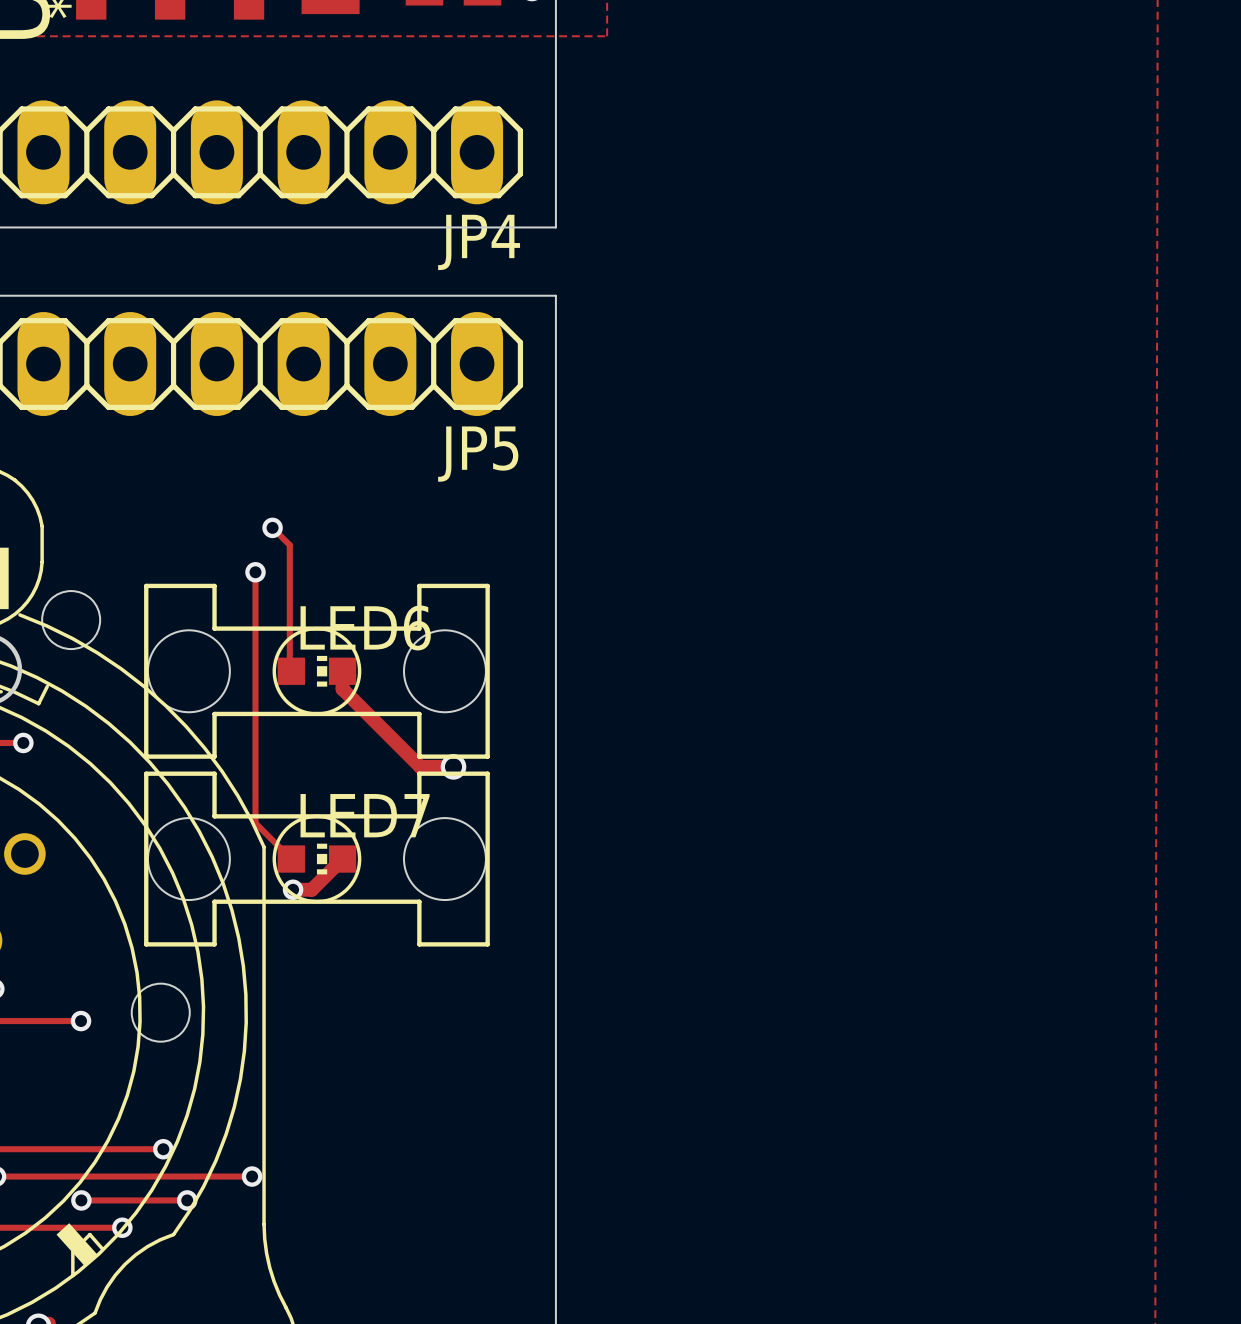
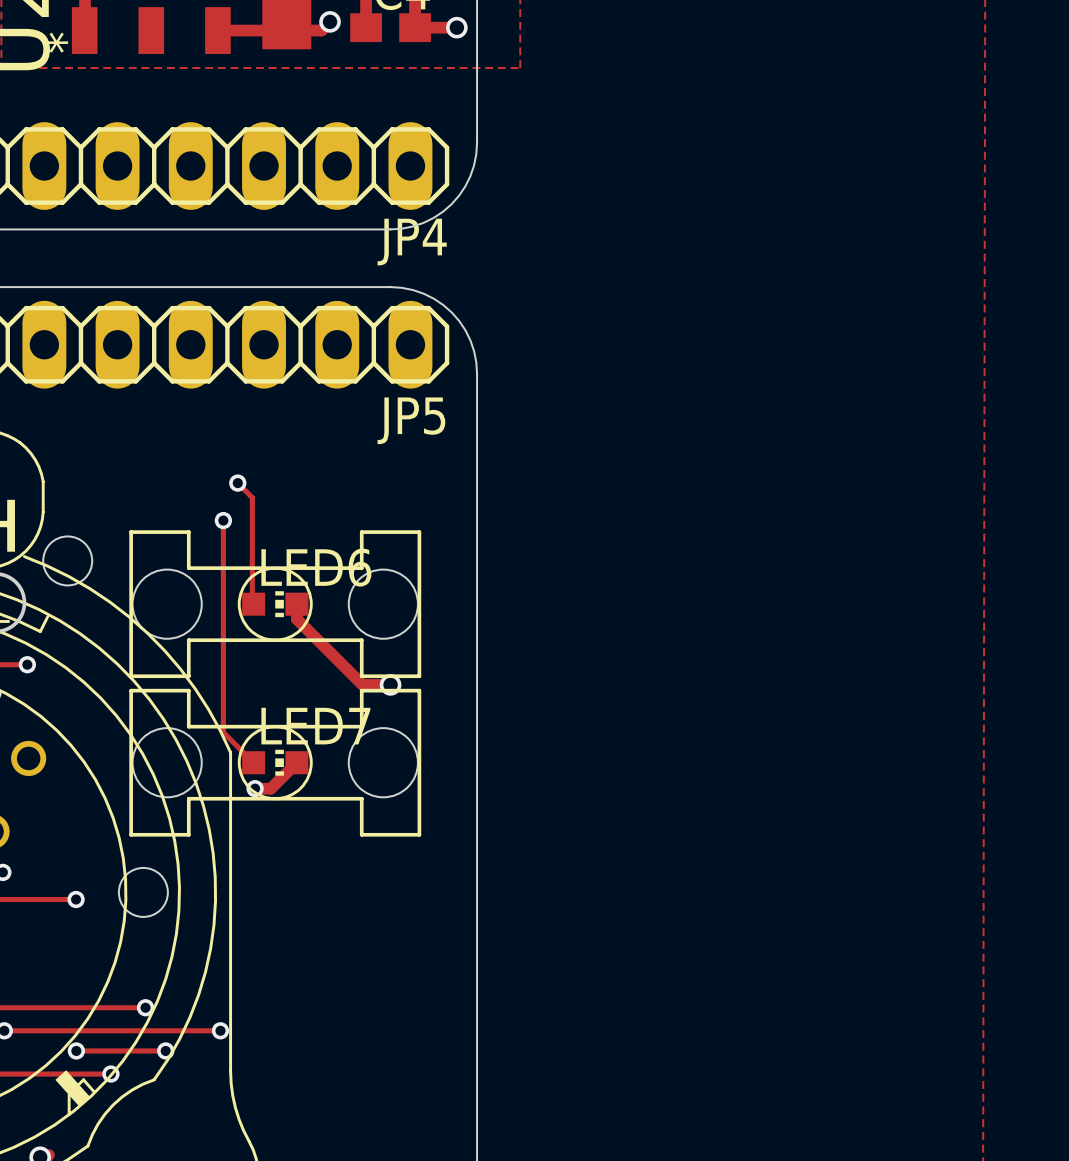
board edge: (555, 125) (555, 227) (453, 227) -> (477, 142) (470, 176) (451, 204) (423, 222) (390, 229)
board edge: (453, 295) (555, 295) (555, 398) -> (390, 287) (423, 293) (451, 312) (470, 340) (477, 373)

